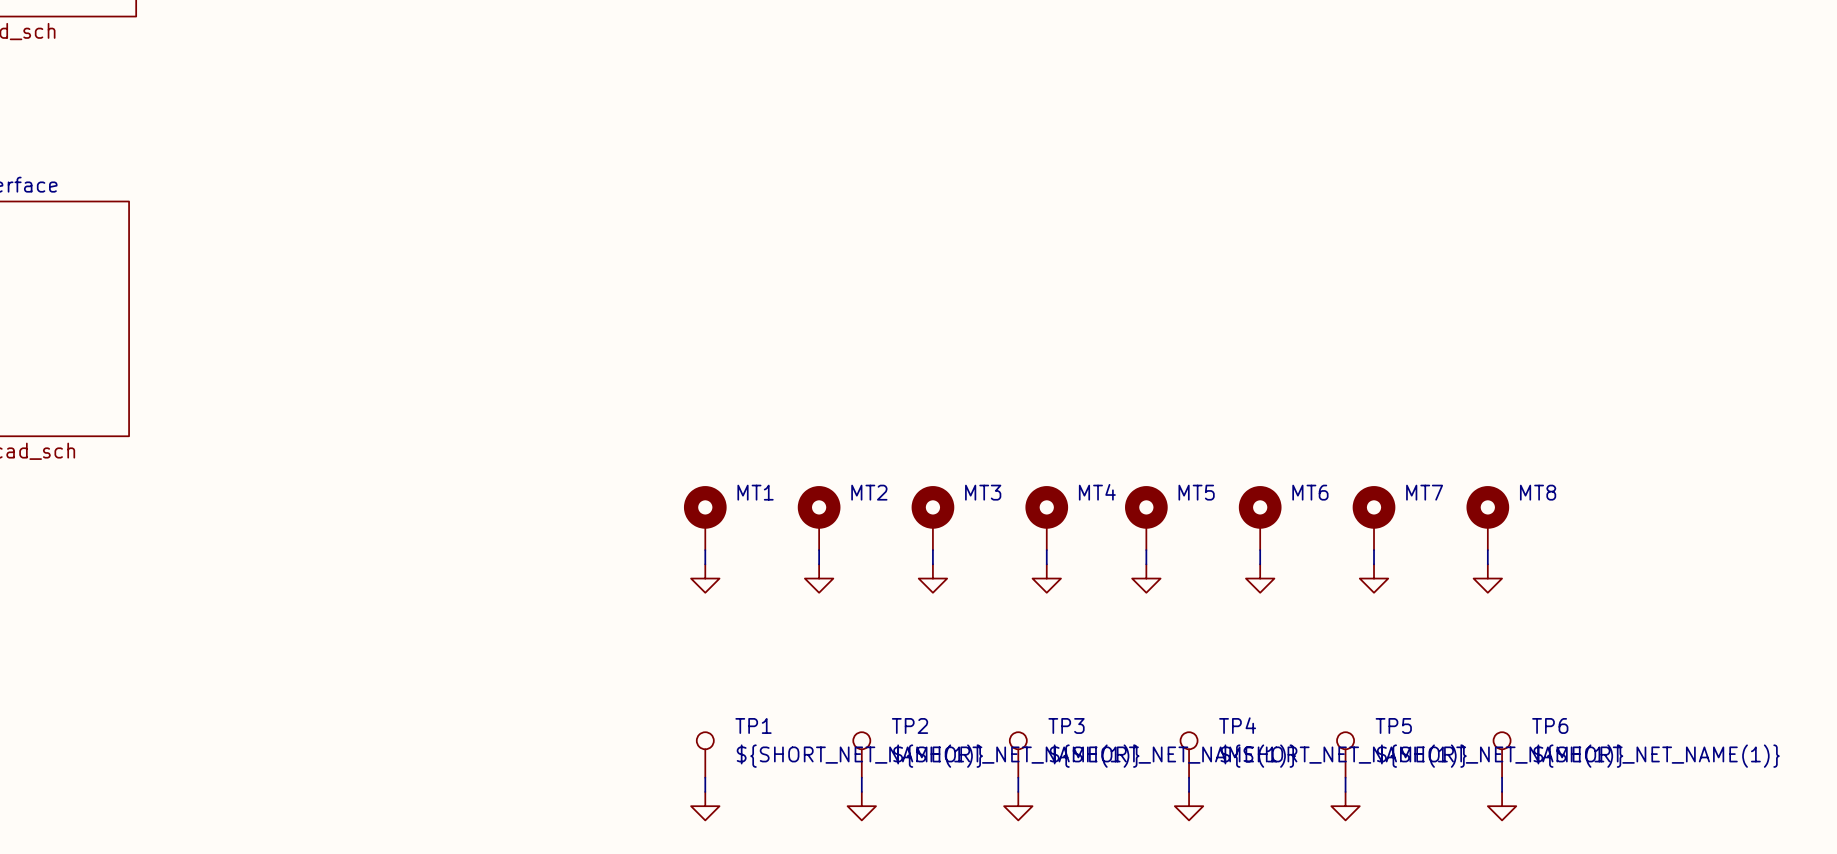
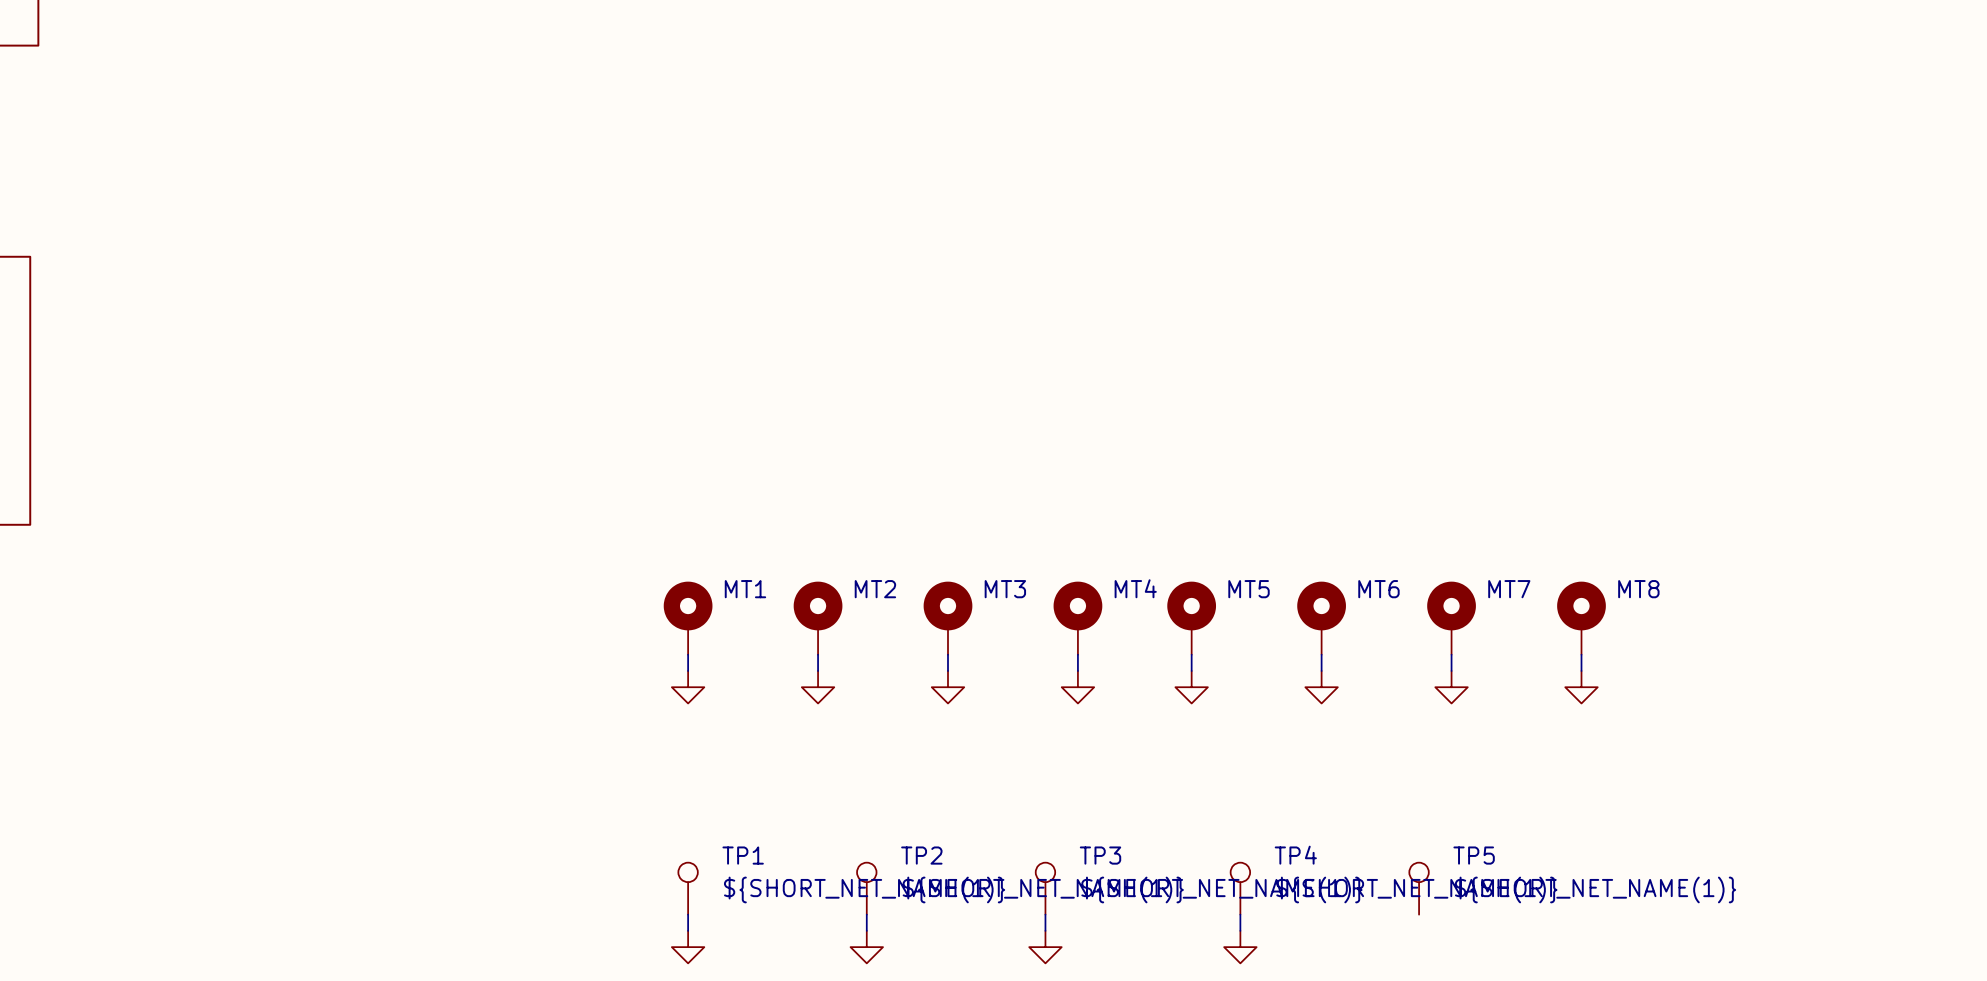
TP6: ${SHORT_NET_NAME(1)} (1502, 754) -> none
wire: (1345, 777) (1345, 791) -> none
wire: (1502, 777) (1502, 791) -> none
power symbol: (1345, 806) -> none
power symbol: (1502, 806) -> none

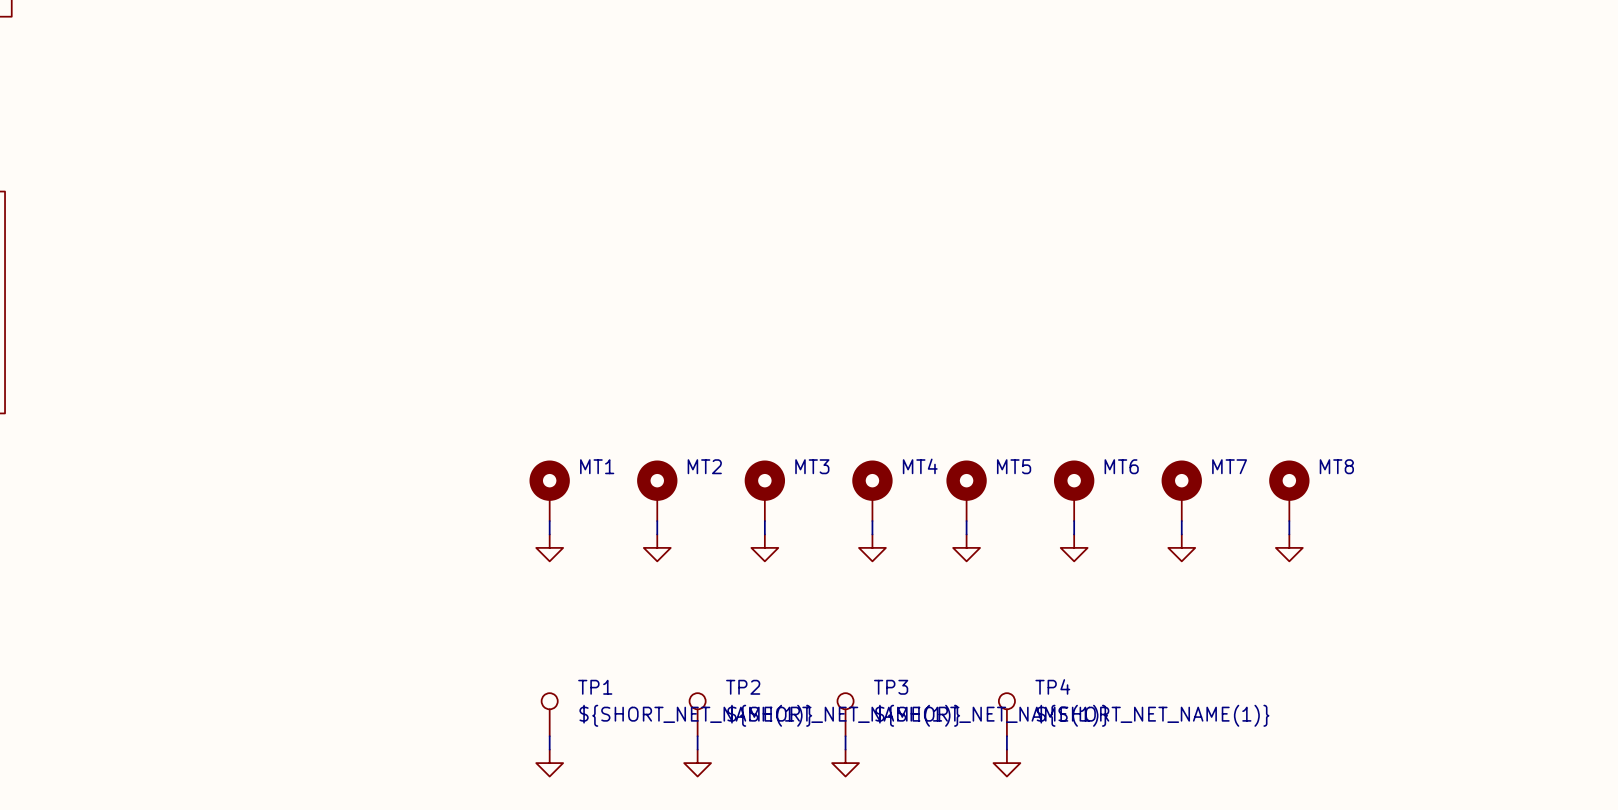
TP5: ${SHORT_NET_NAME(1)} (1419, 888) -> none

